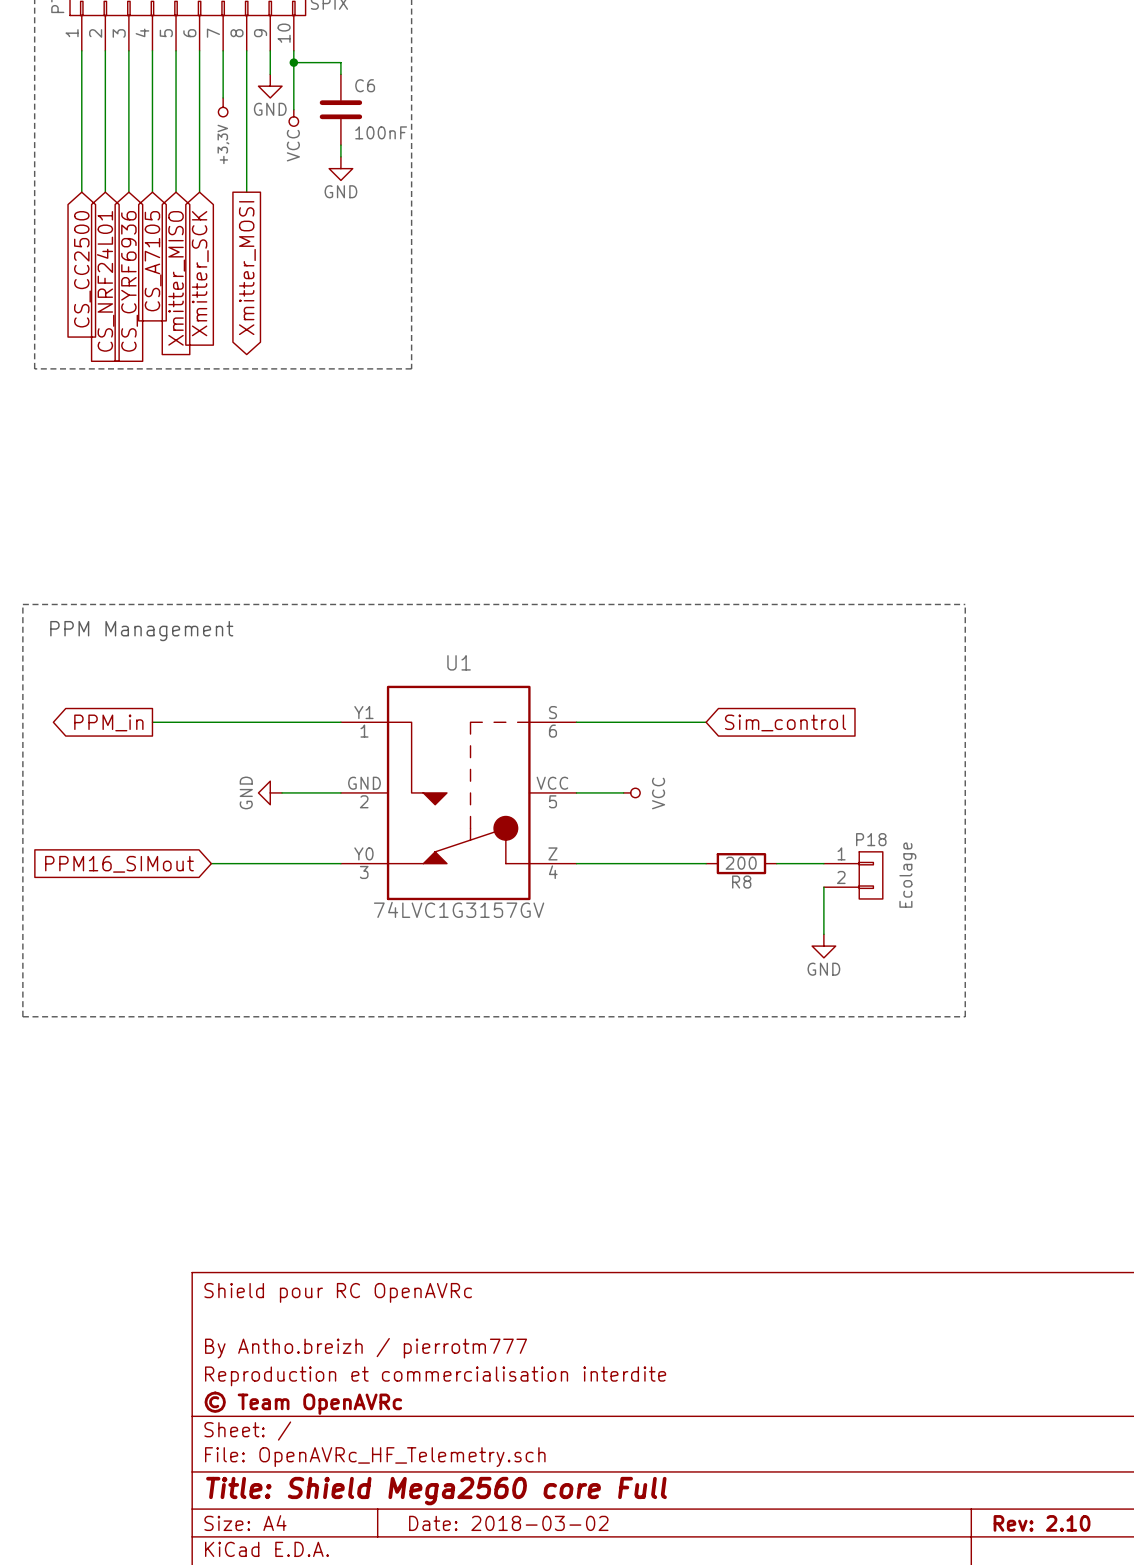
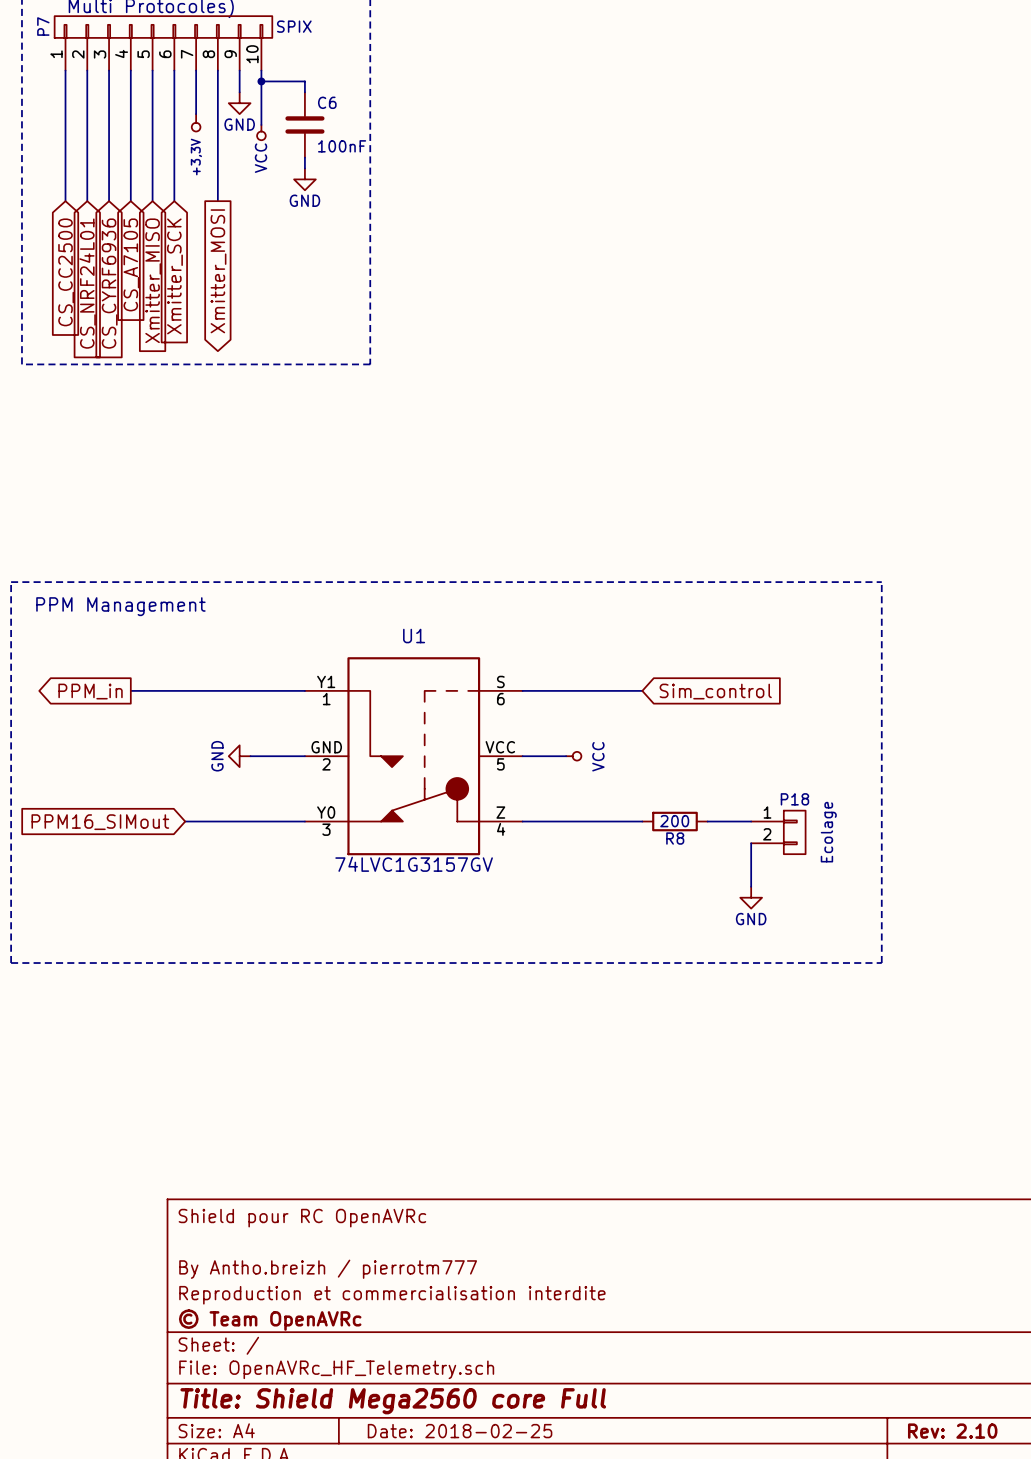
title block: Date: 2018-03-02 (508, 1523) -> Date: 2018-02-25 (460, 1431)

